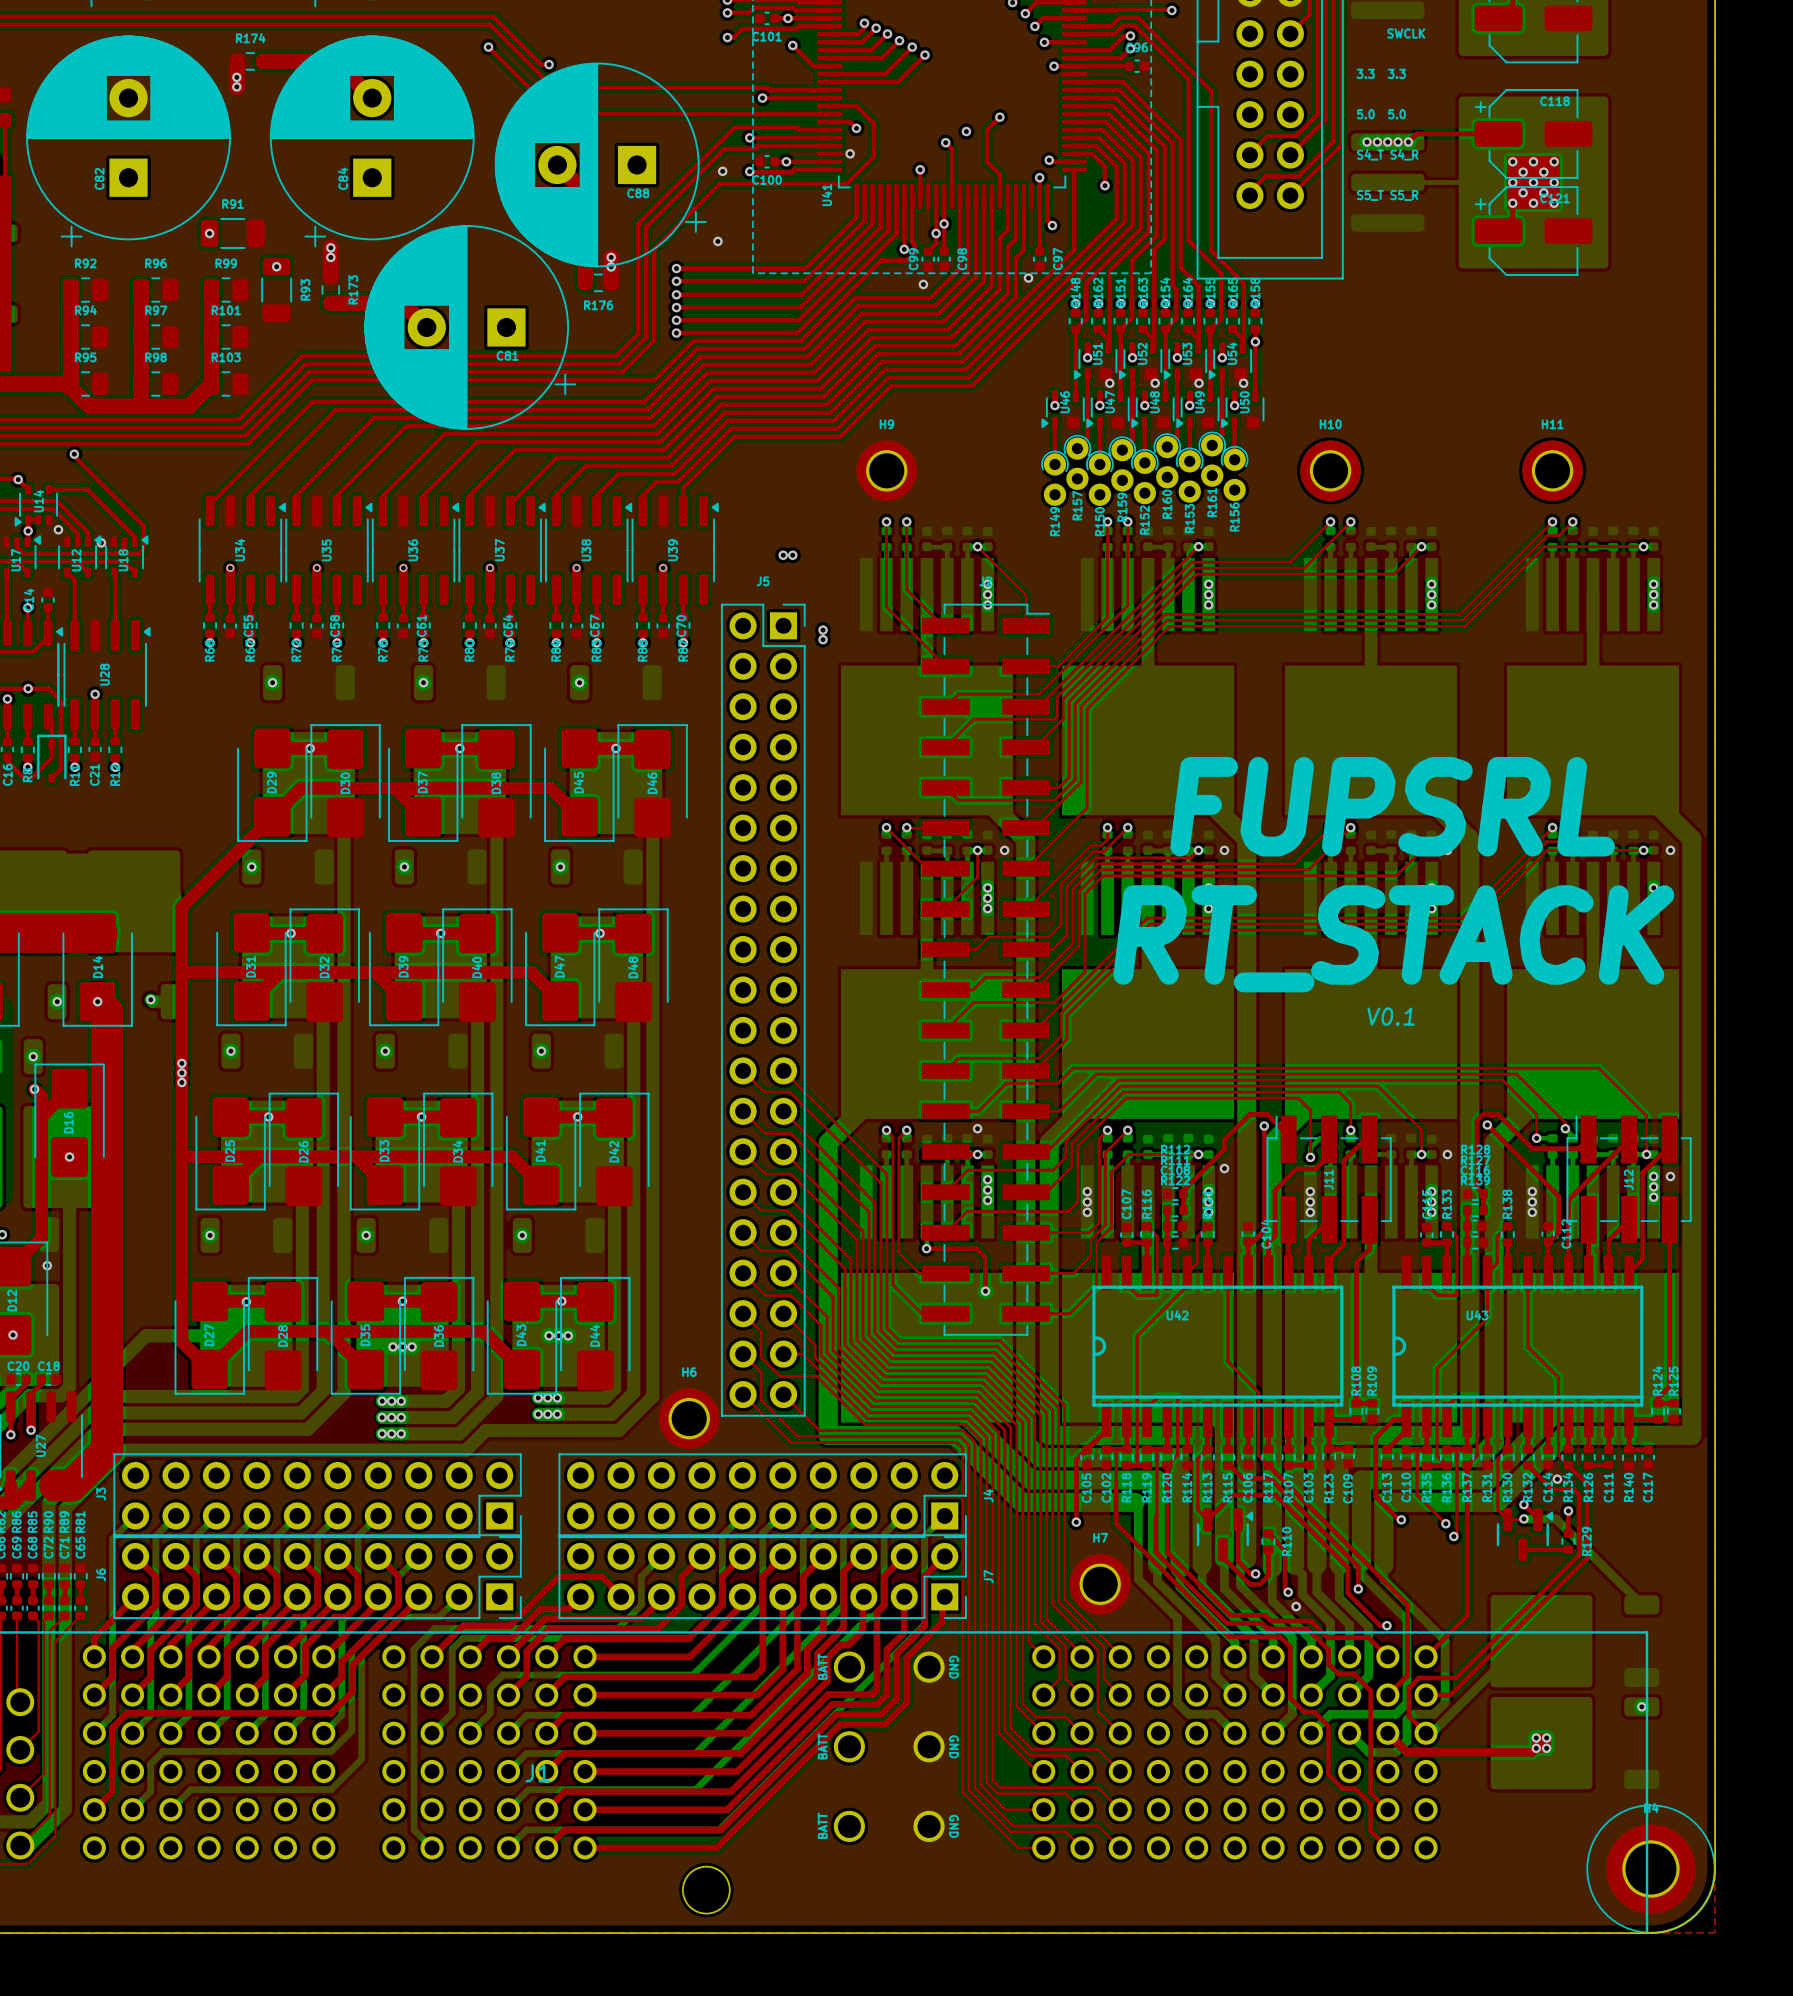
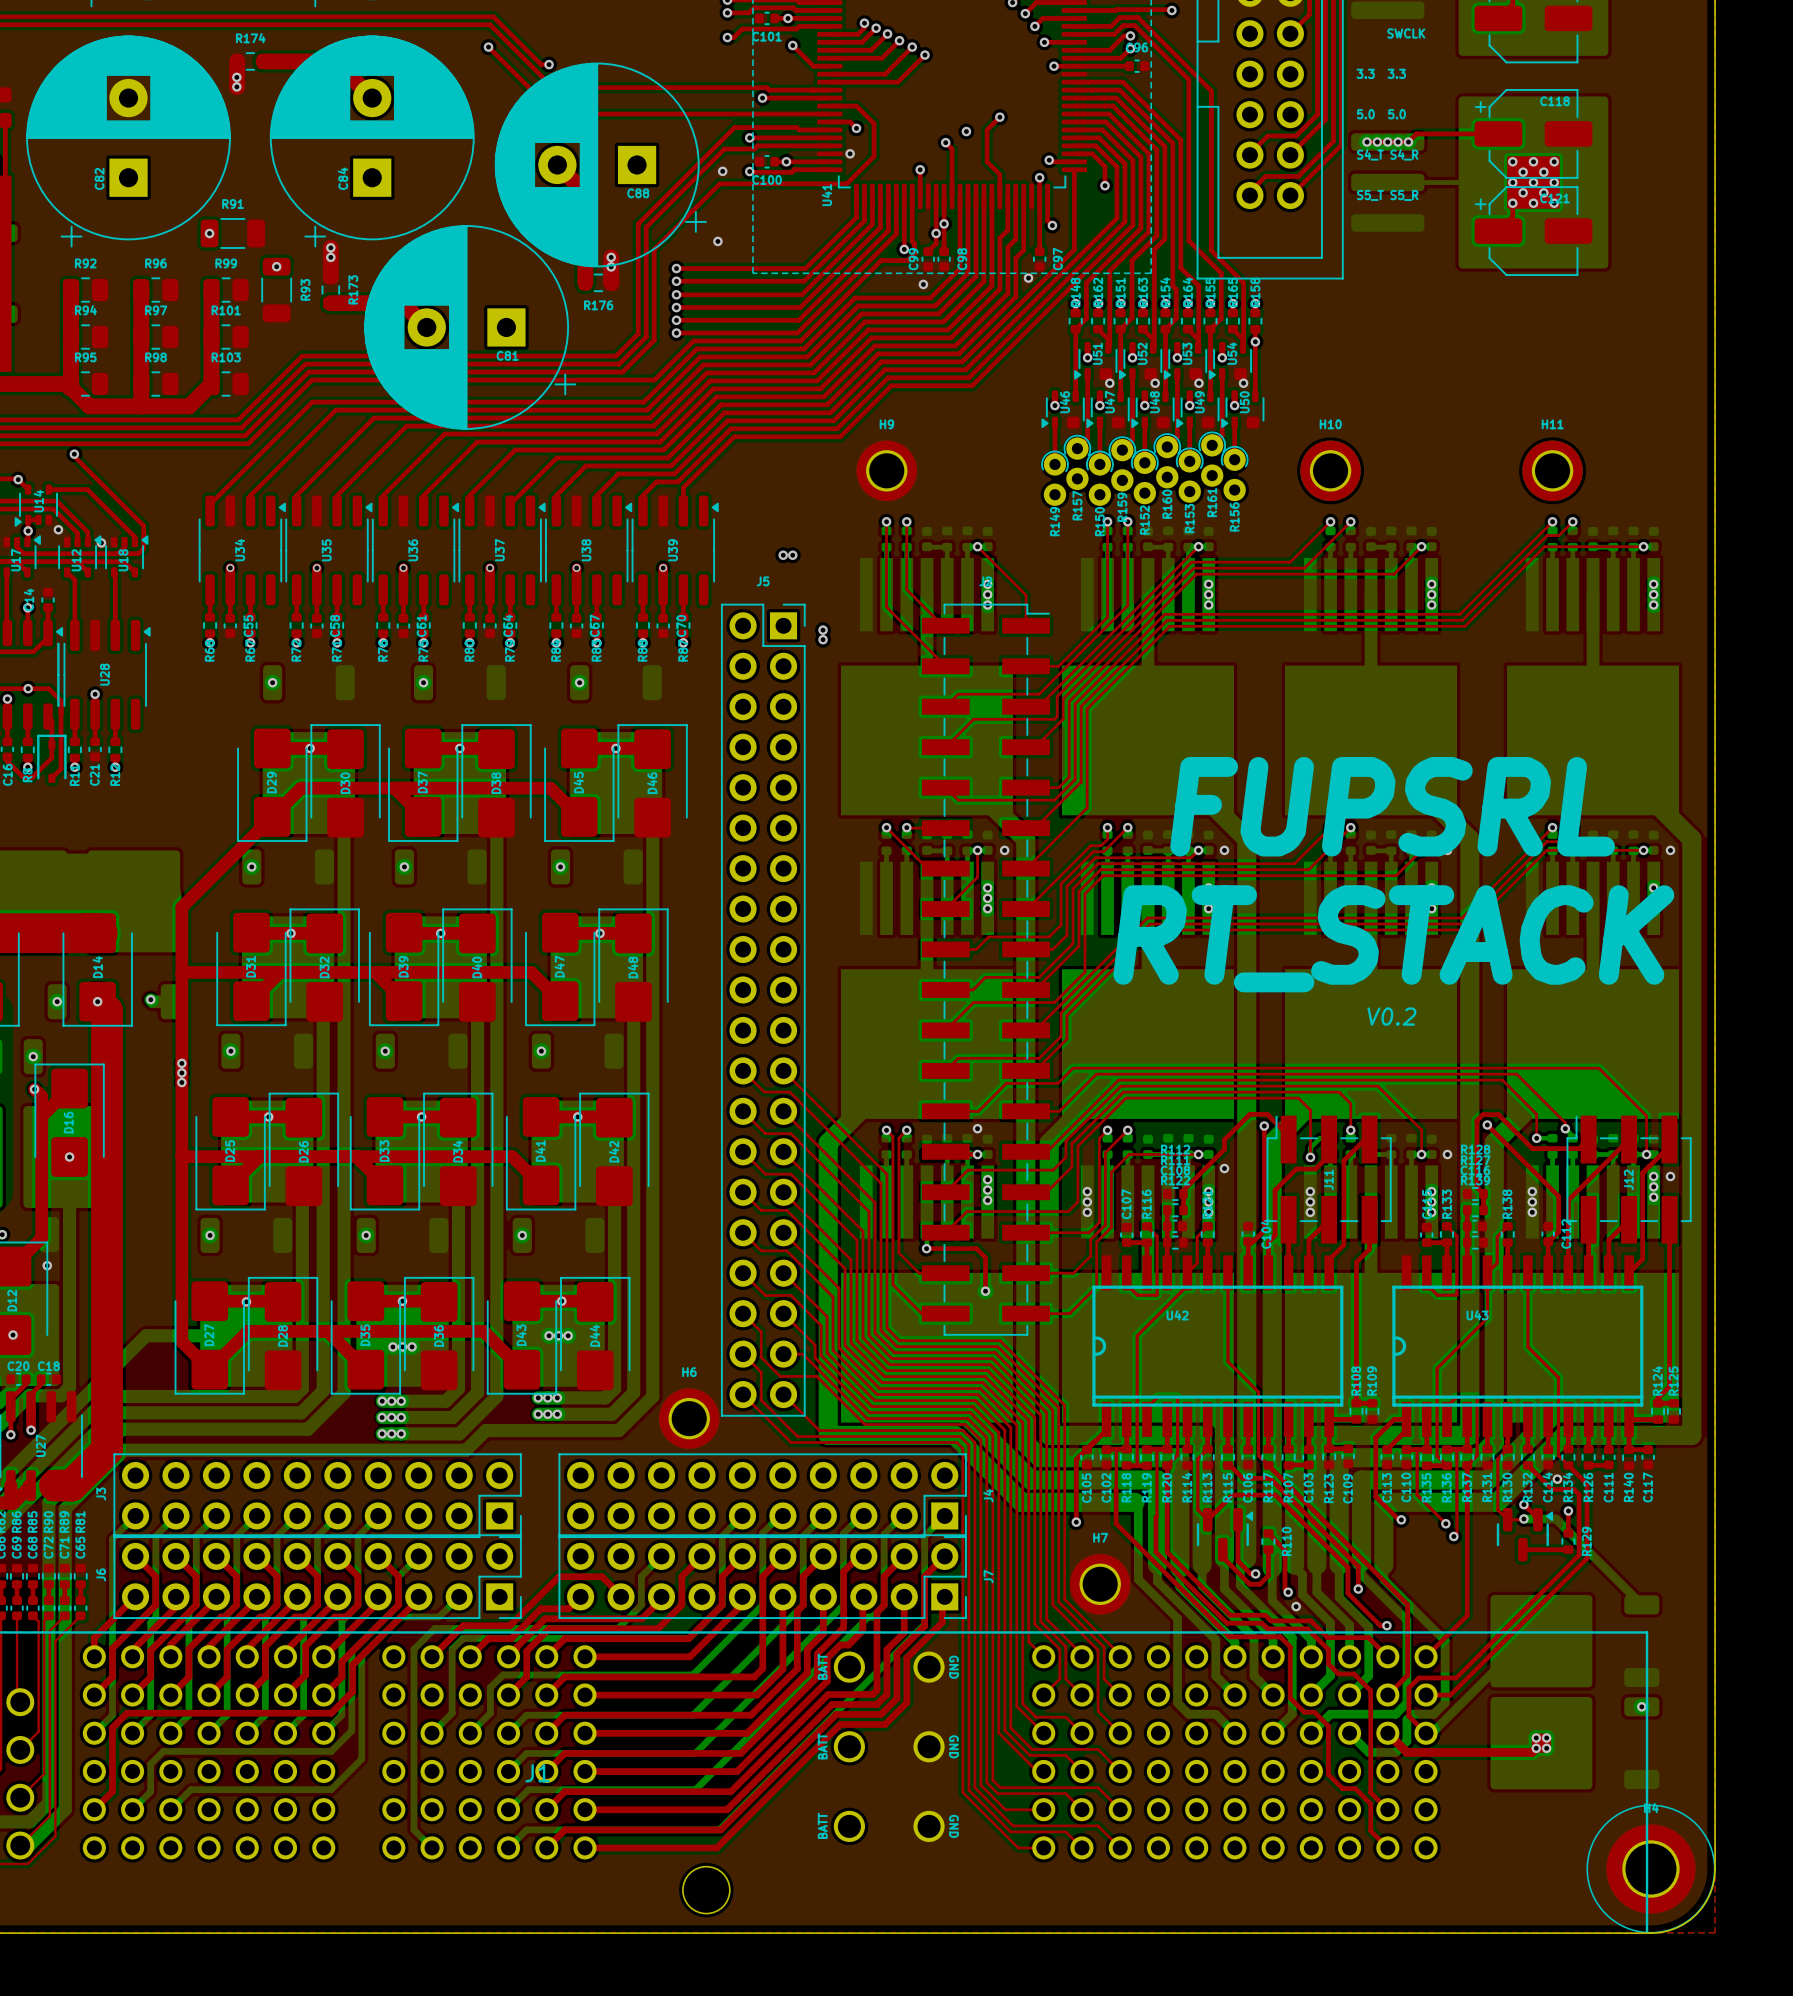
text: V0.1 (1391, 1016) -> V0.2 (1391, 1016)

